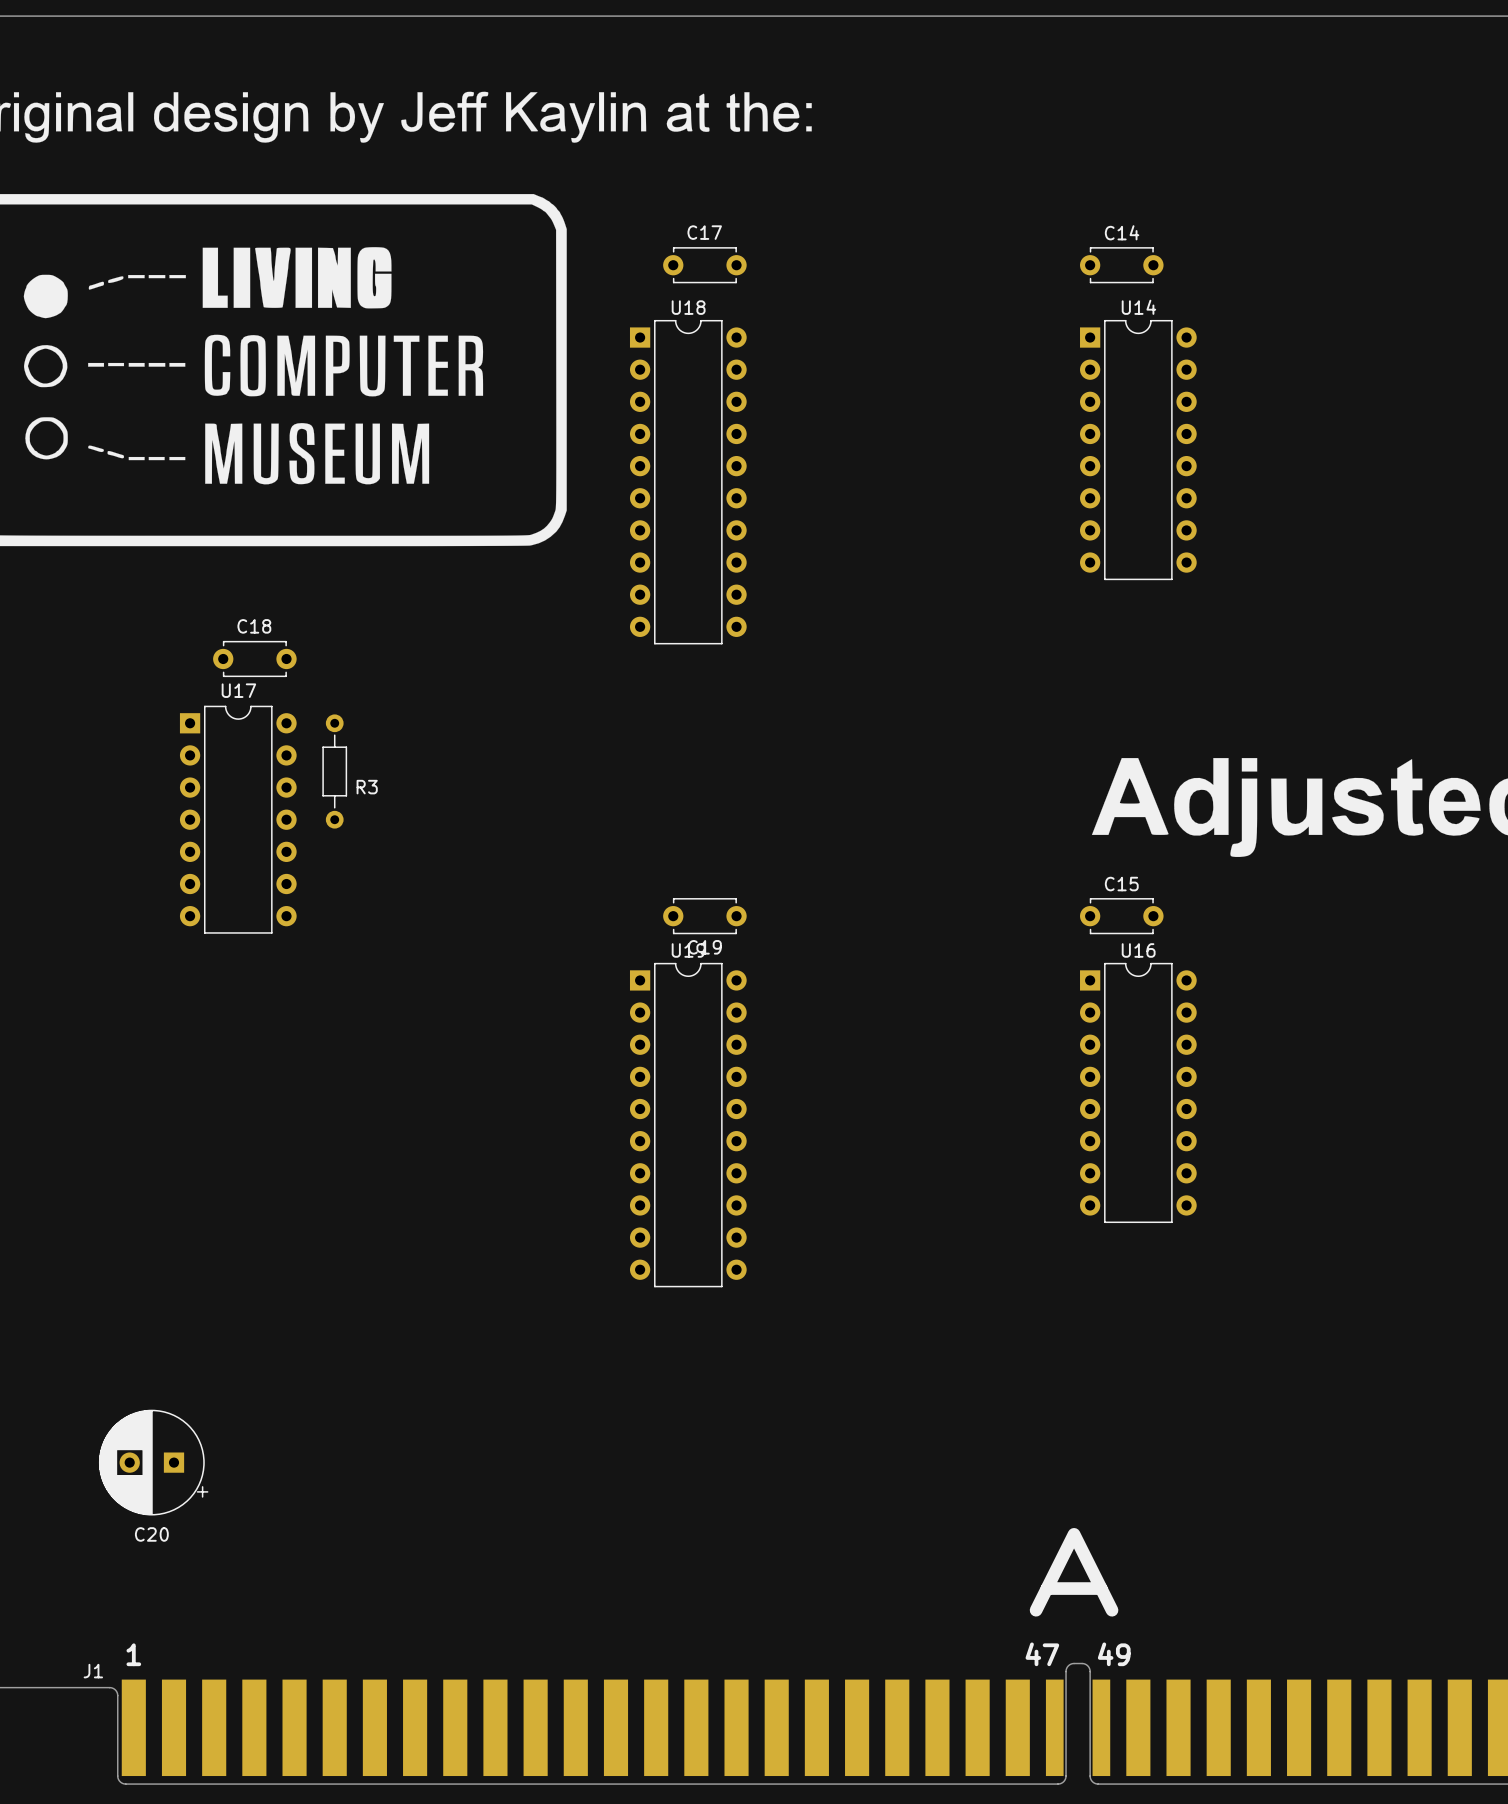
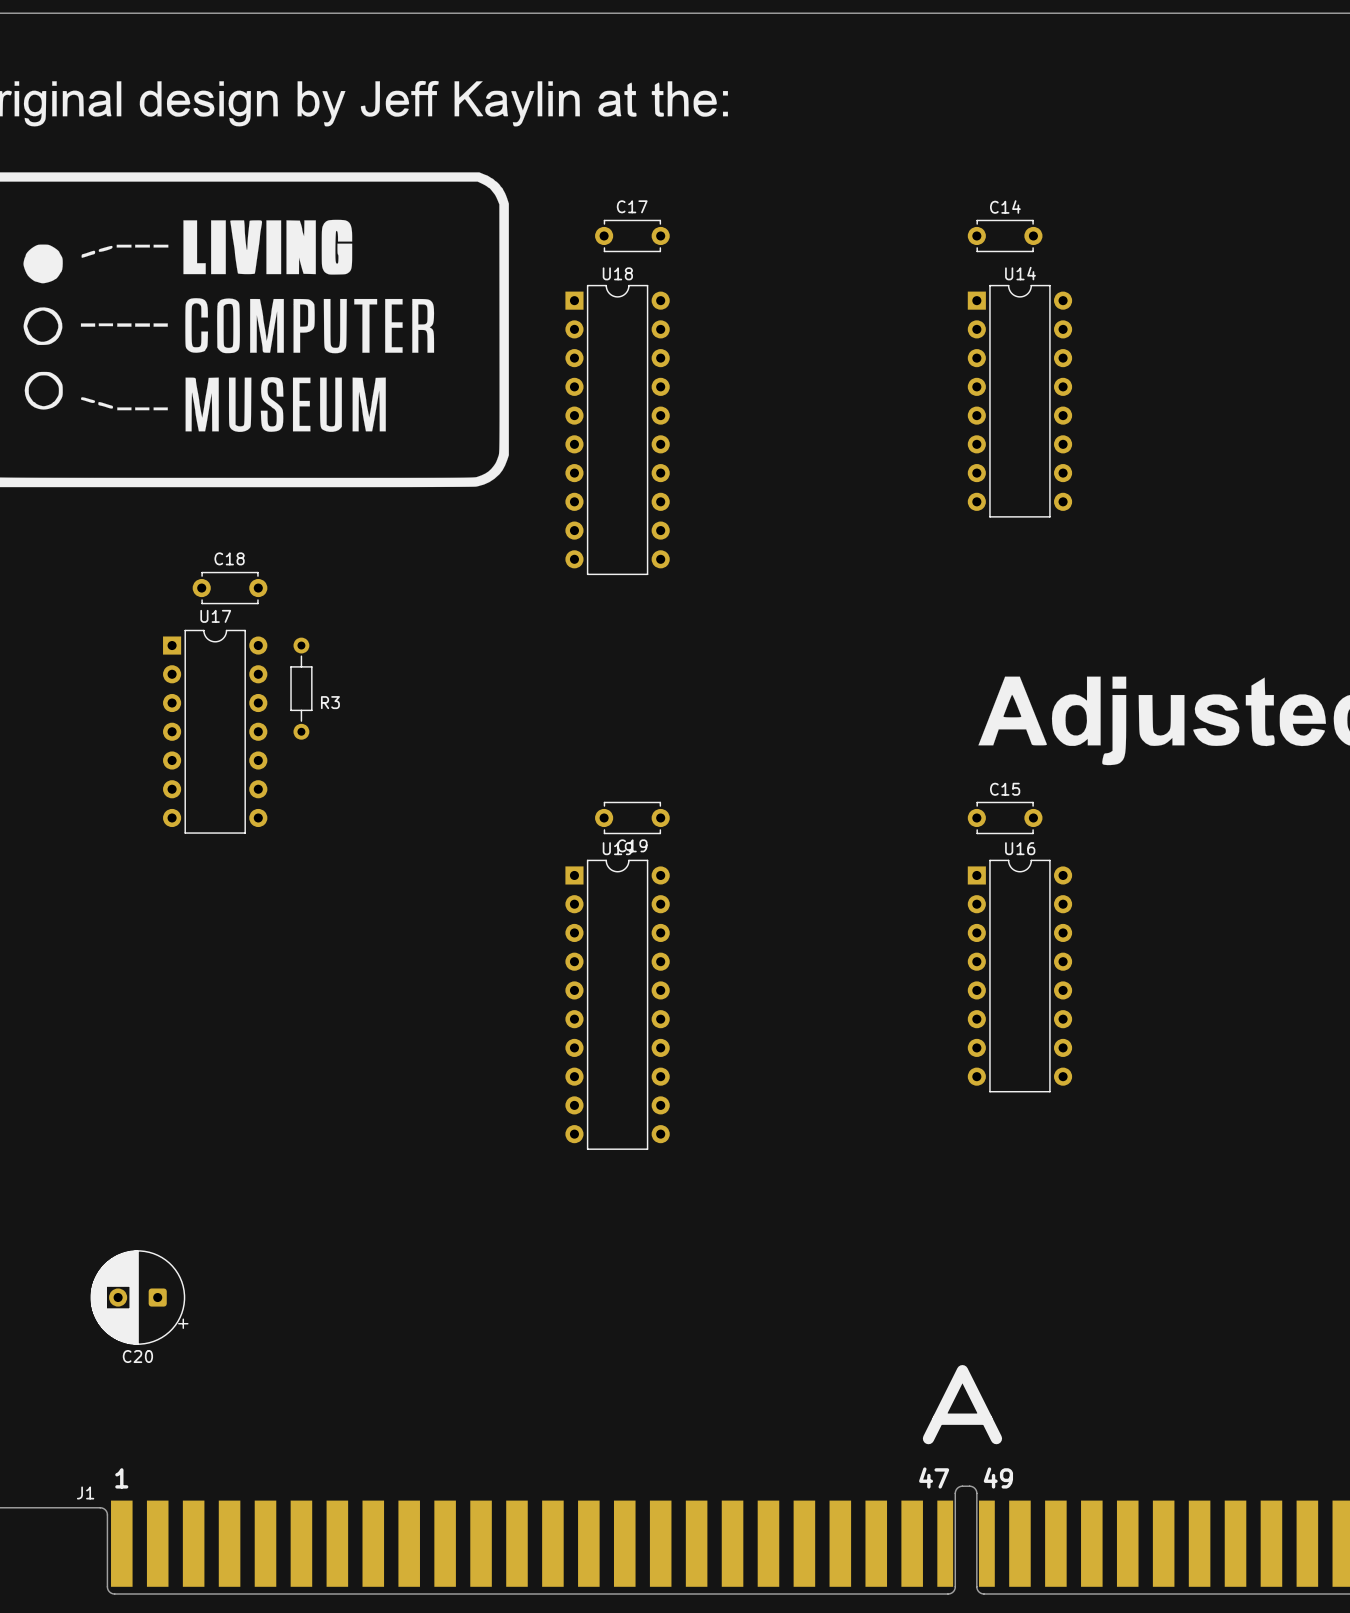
C20 footprint: [98, 1409, 209, 1516] -> [90, 1250, 189, 1345]

